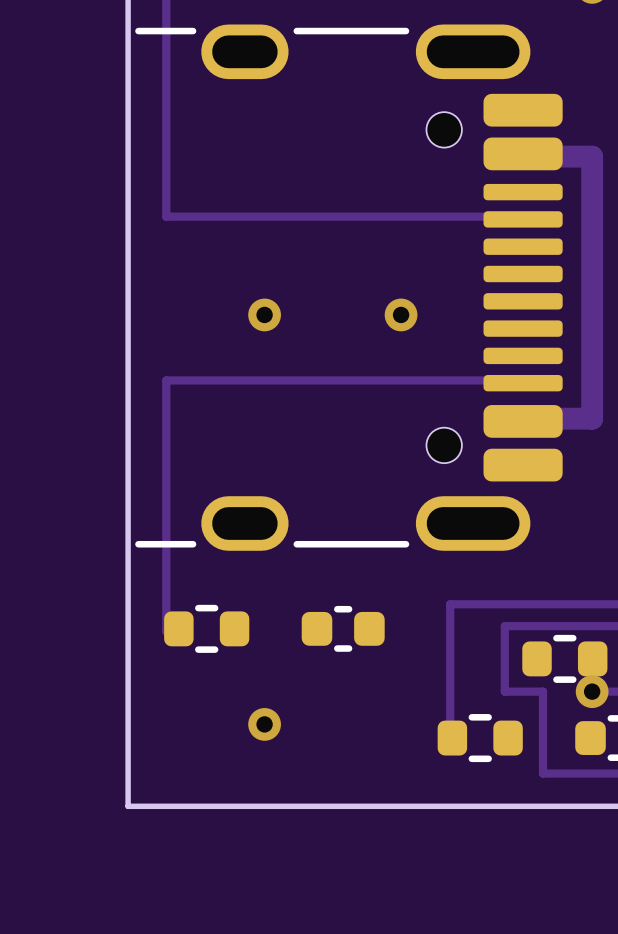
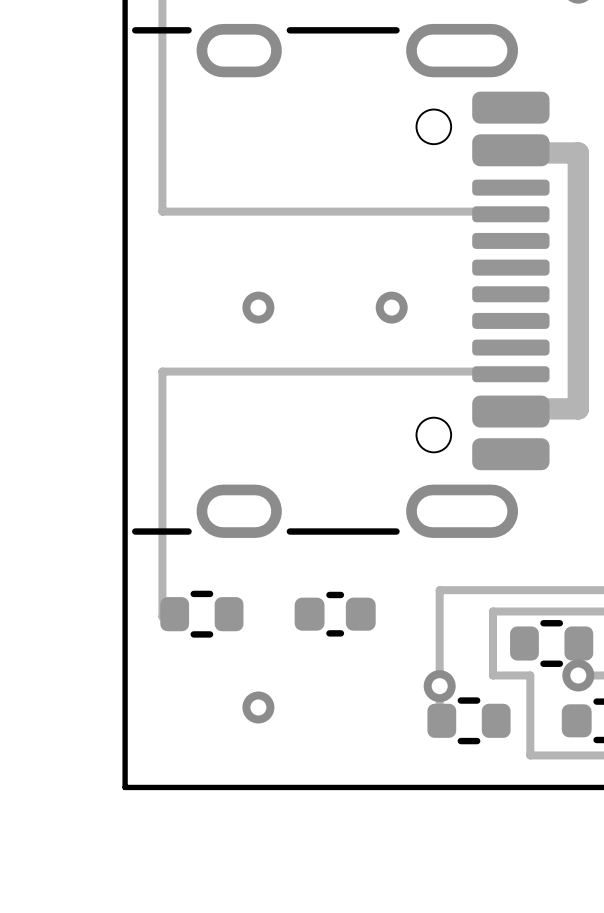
via: none -> (439, 686)

